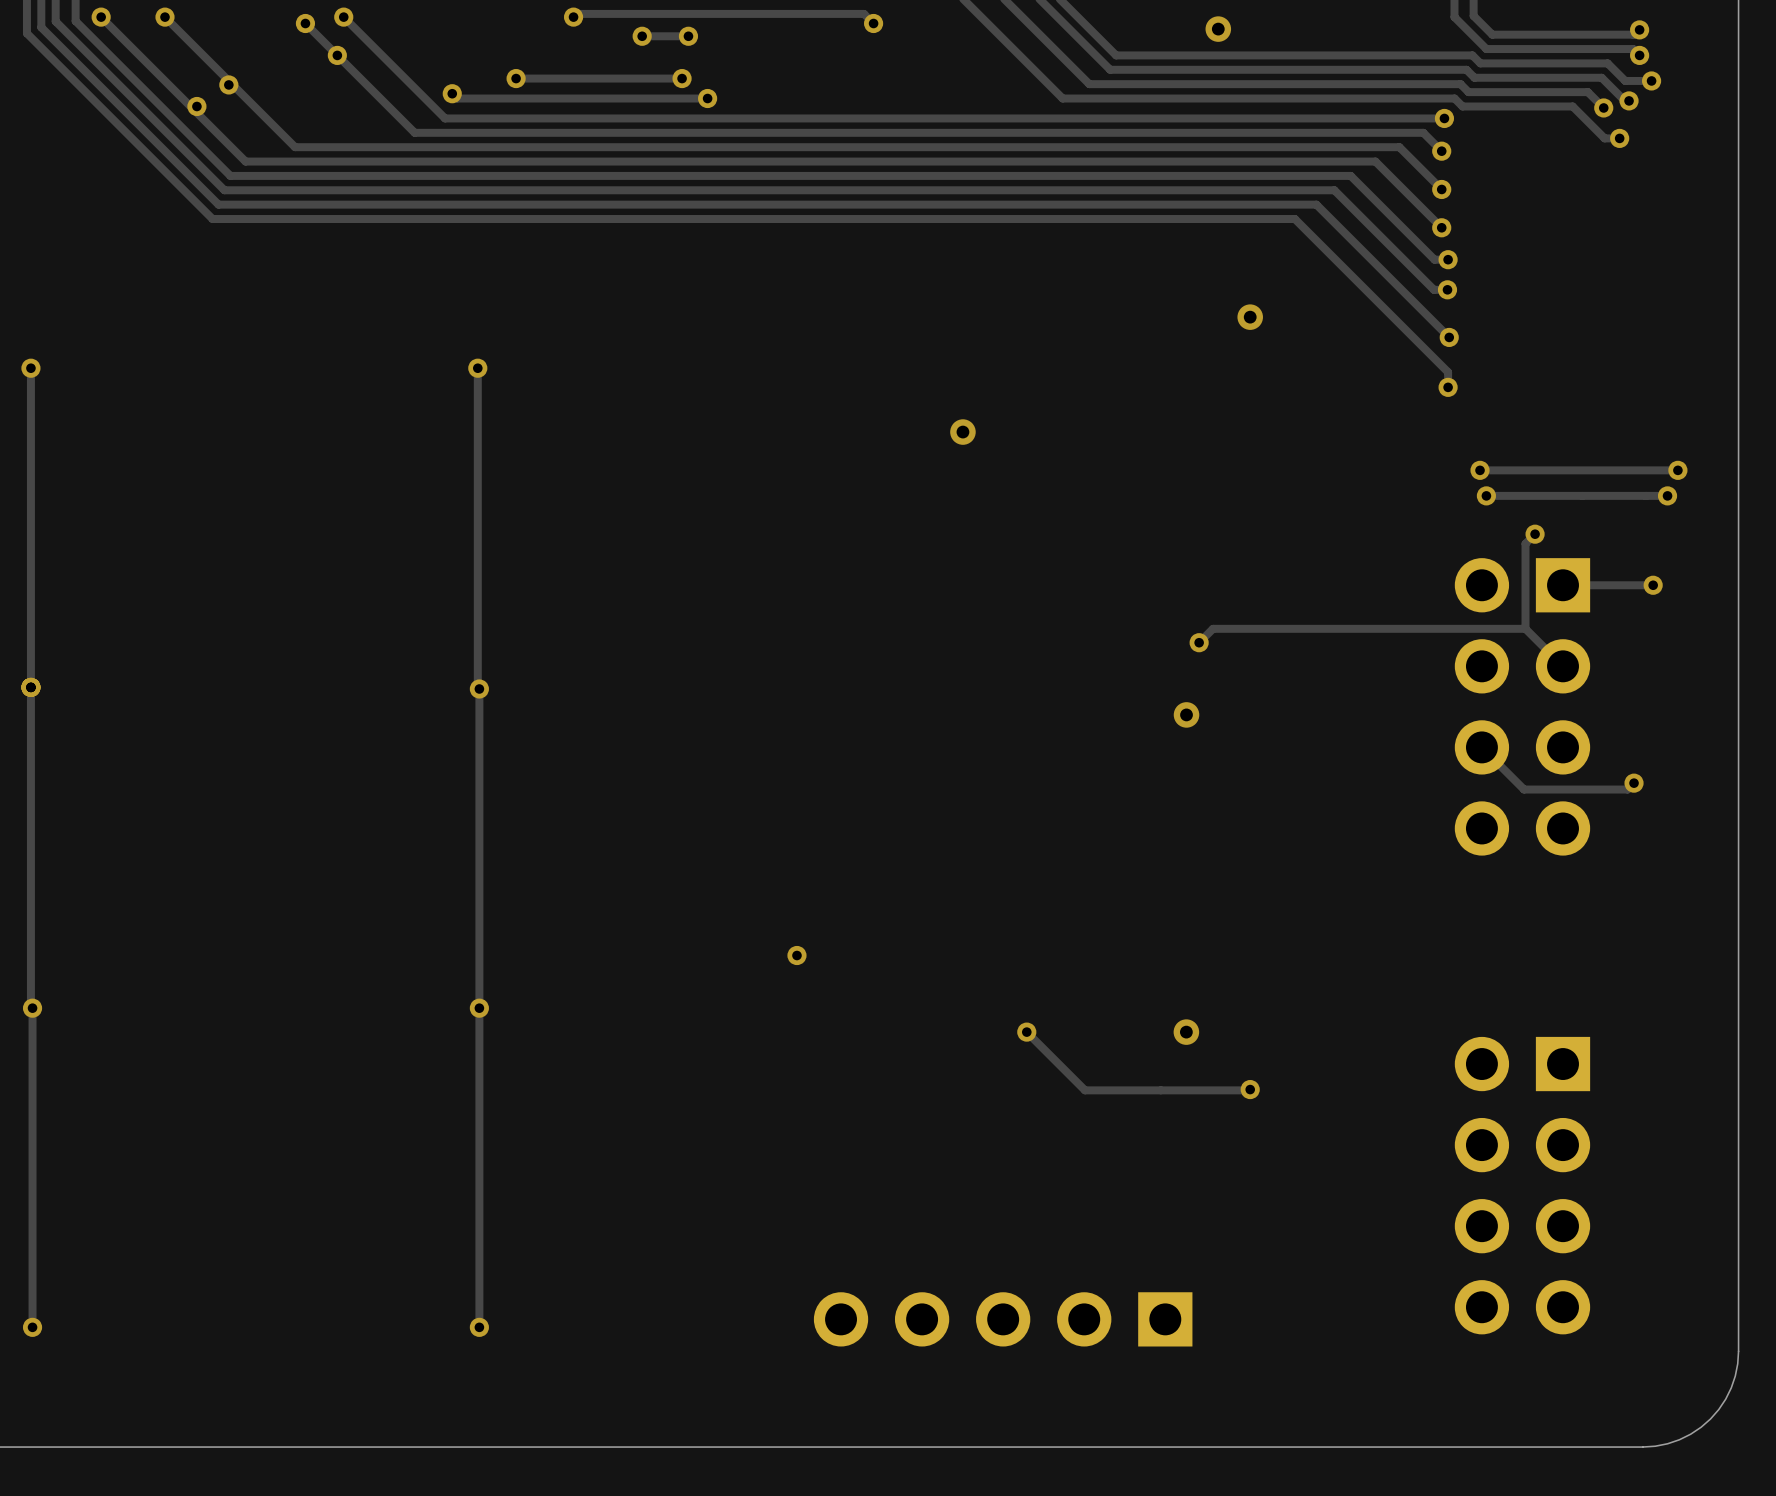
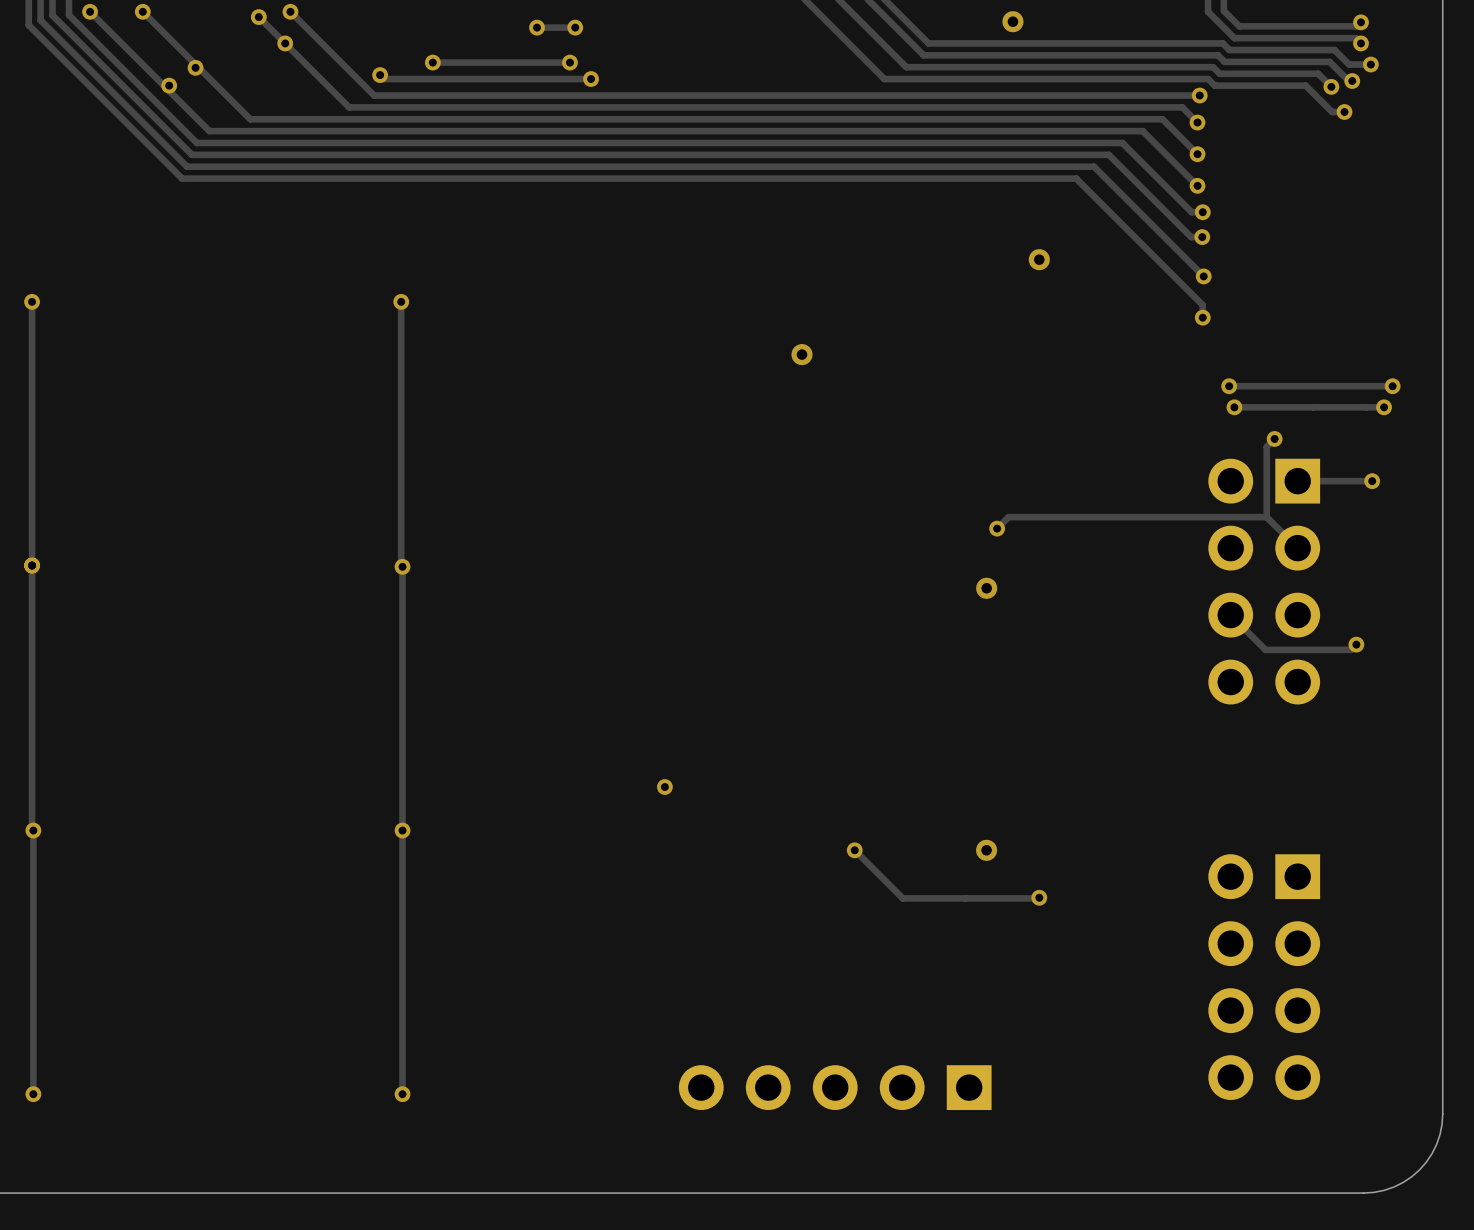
track: (573, 17) (576, 13) (864, 13) (873, 23) -> none
via: (573, 17) -> none
via: (873, 23) -> none

